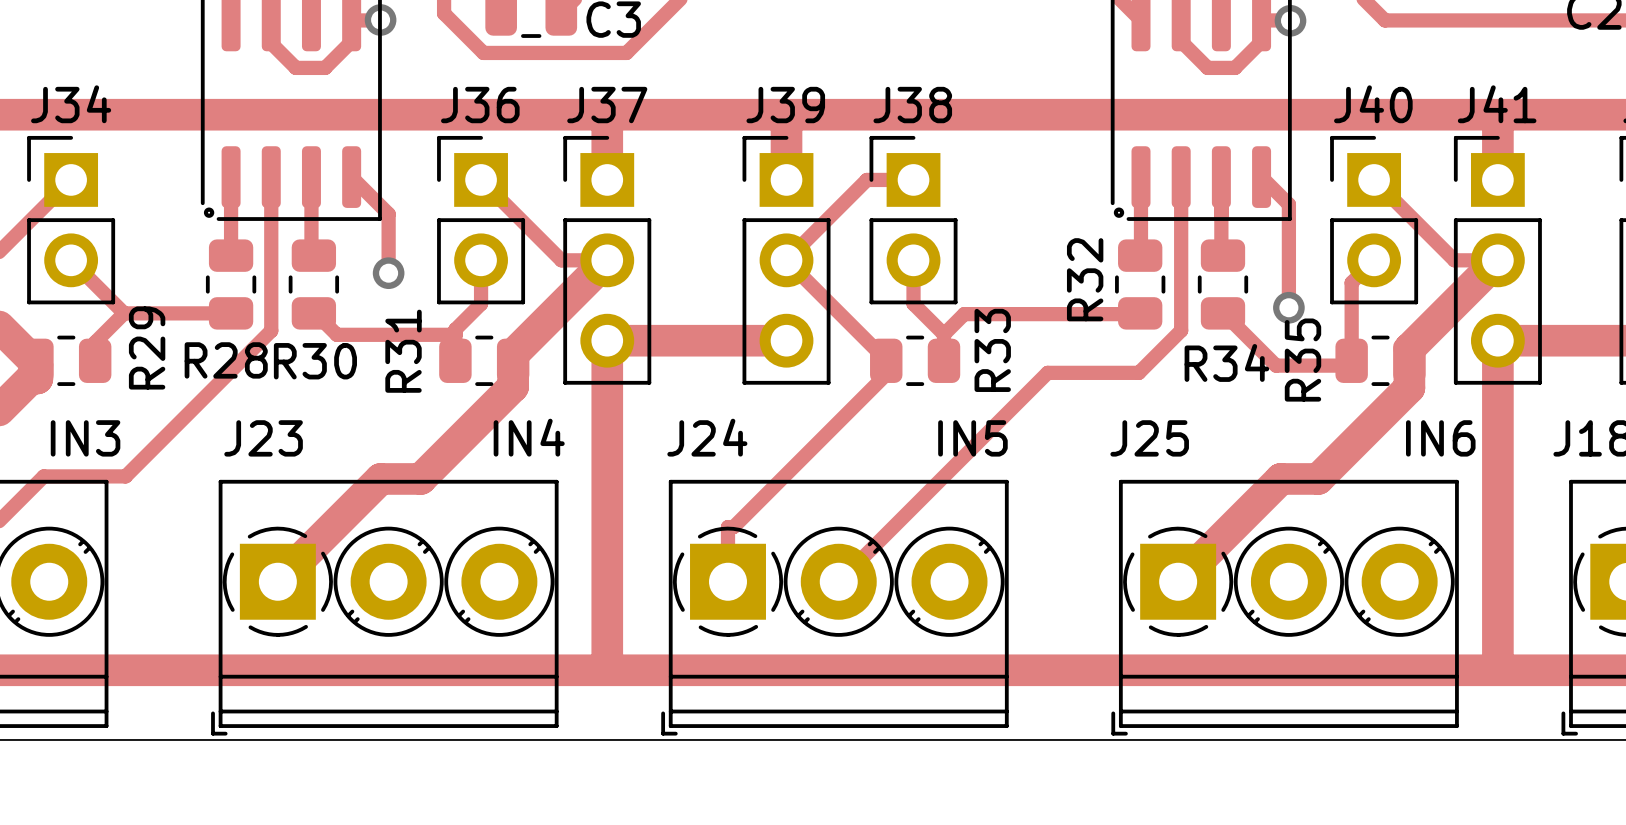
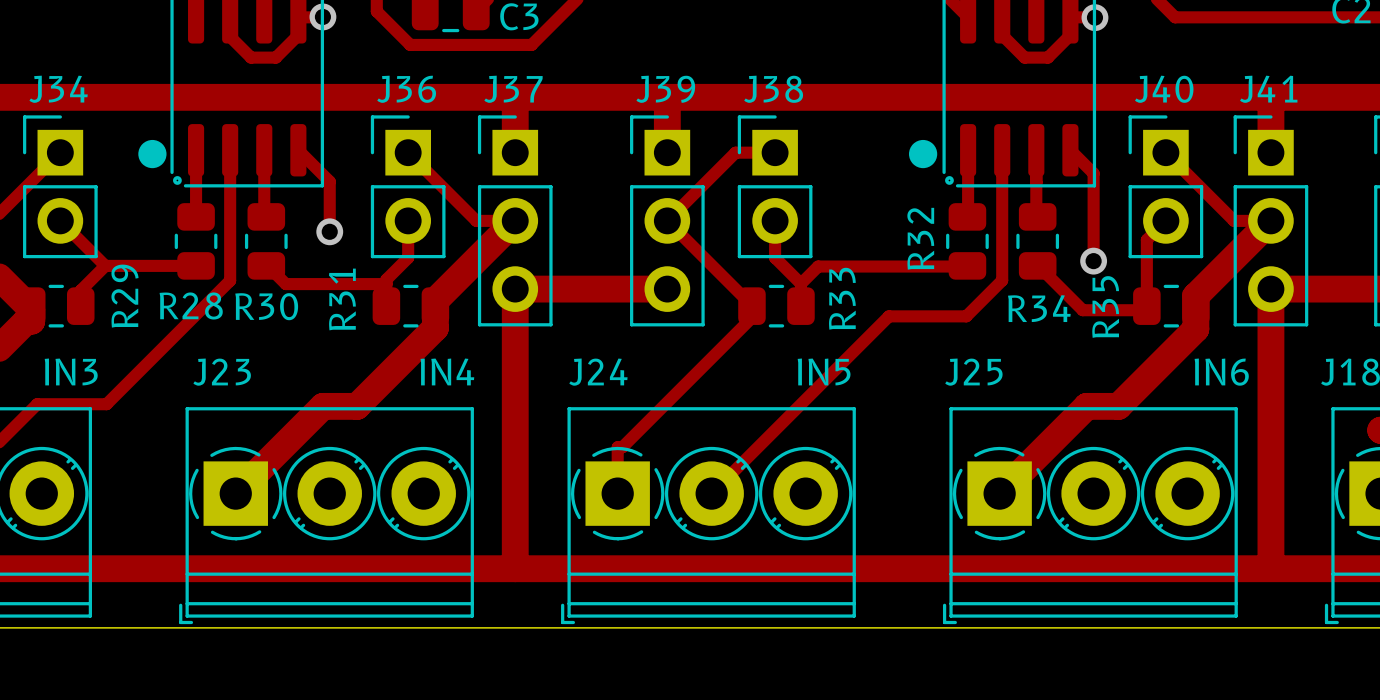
drawing: none -> [138, 139, 167, 169]
drawing: none -> [909, 139, 938, 169]

